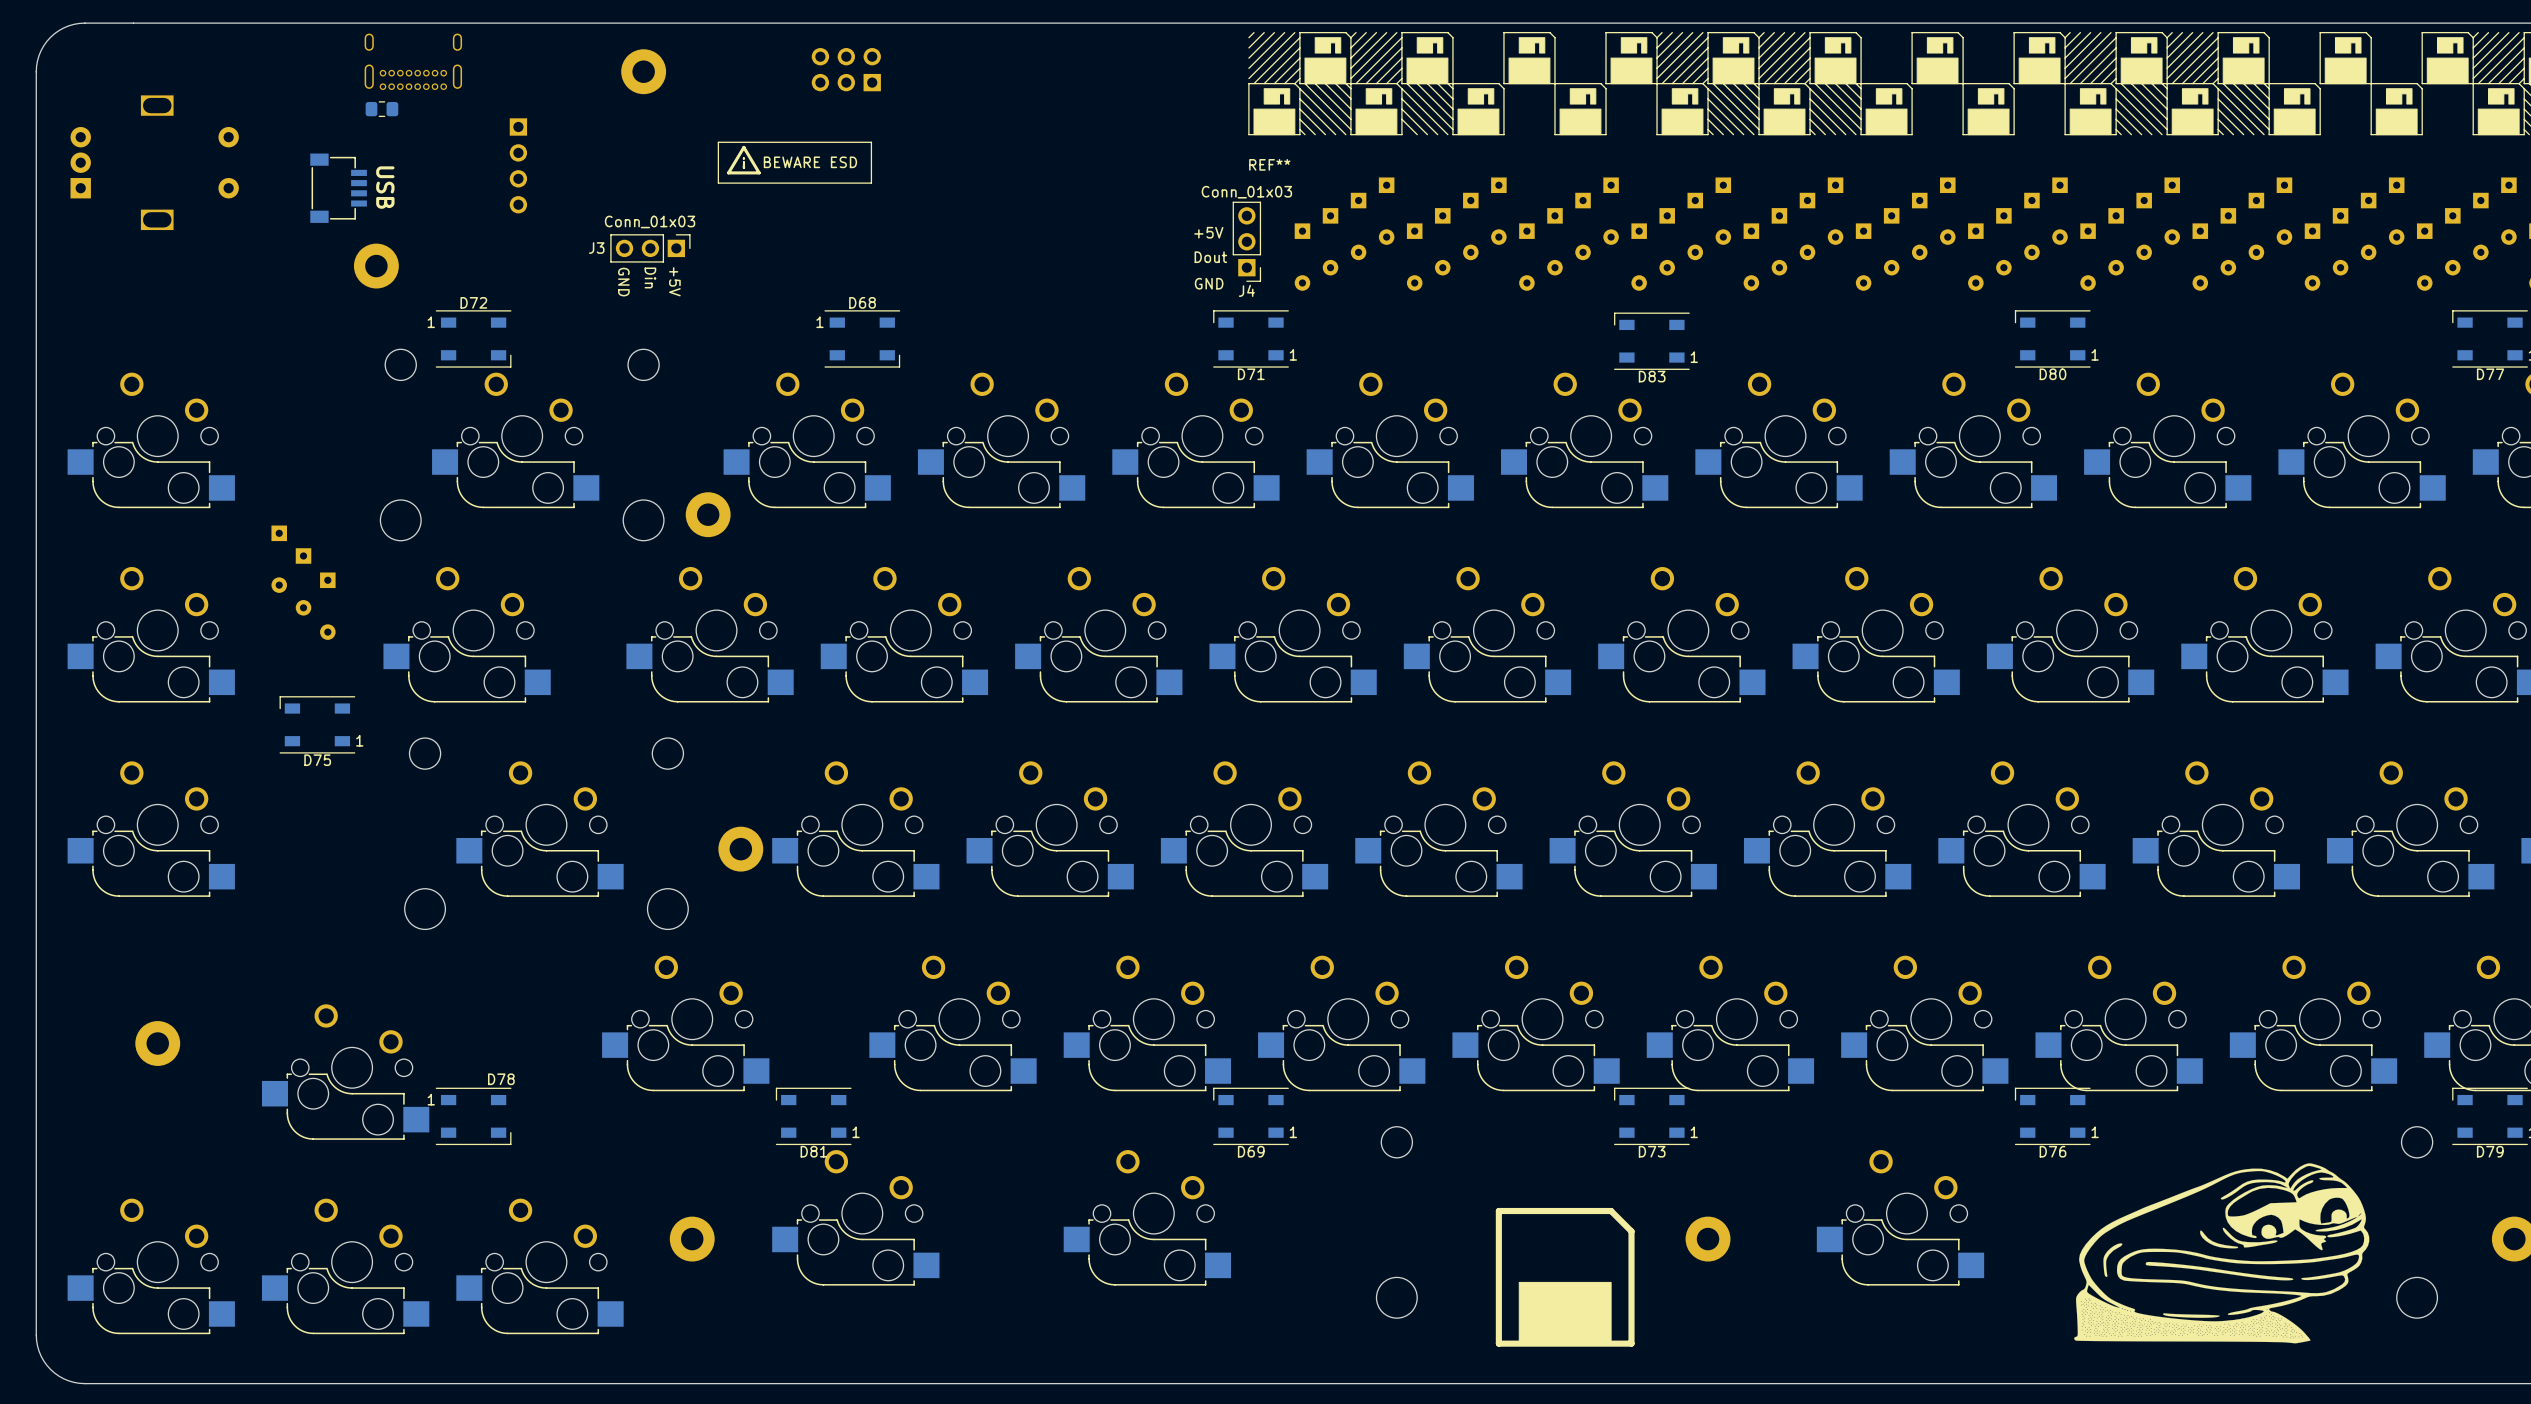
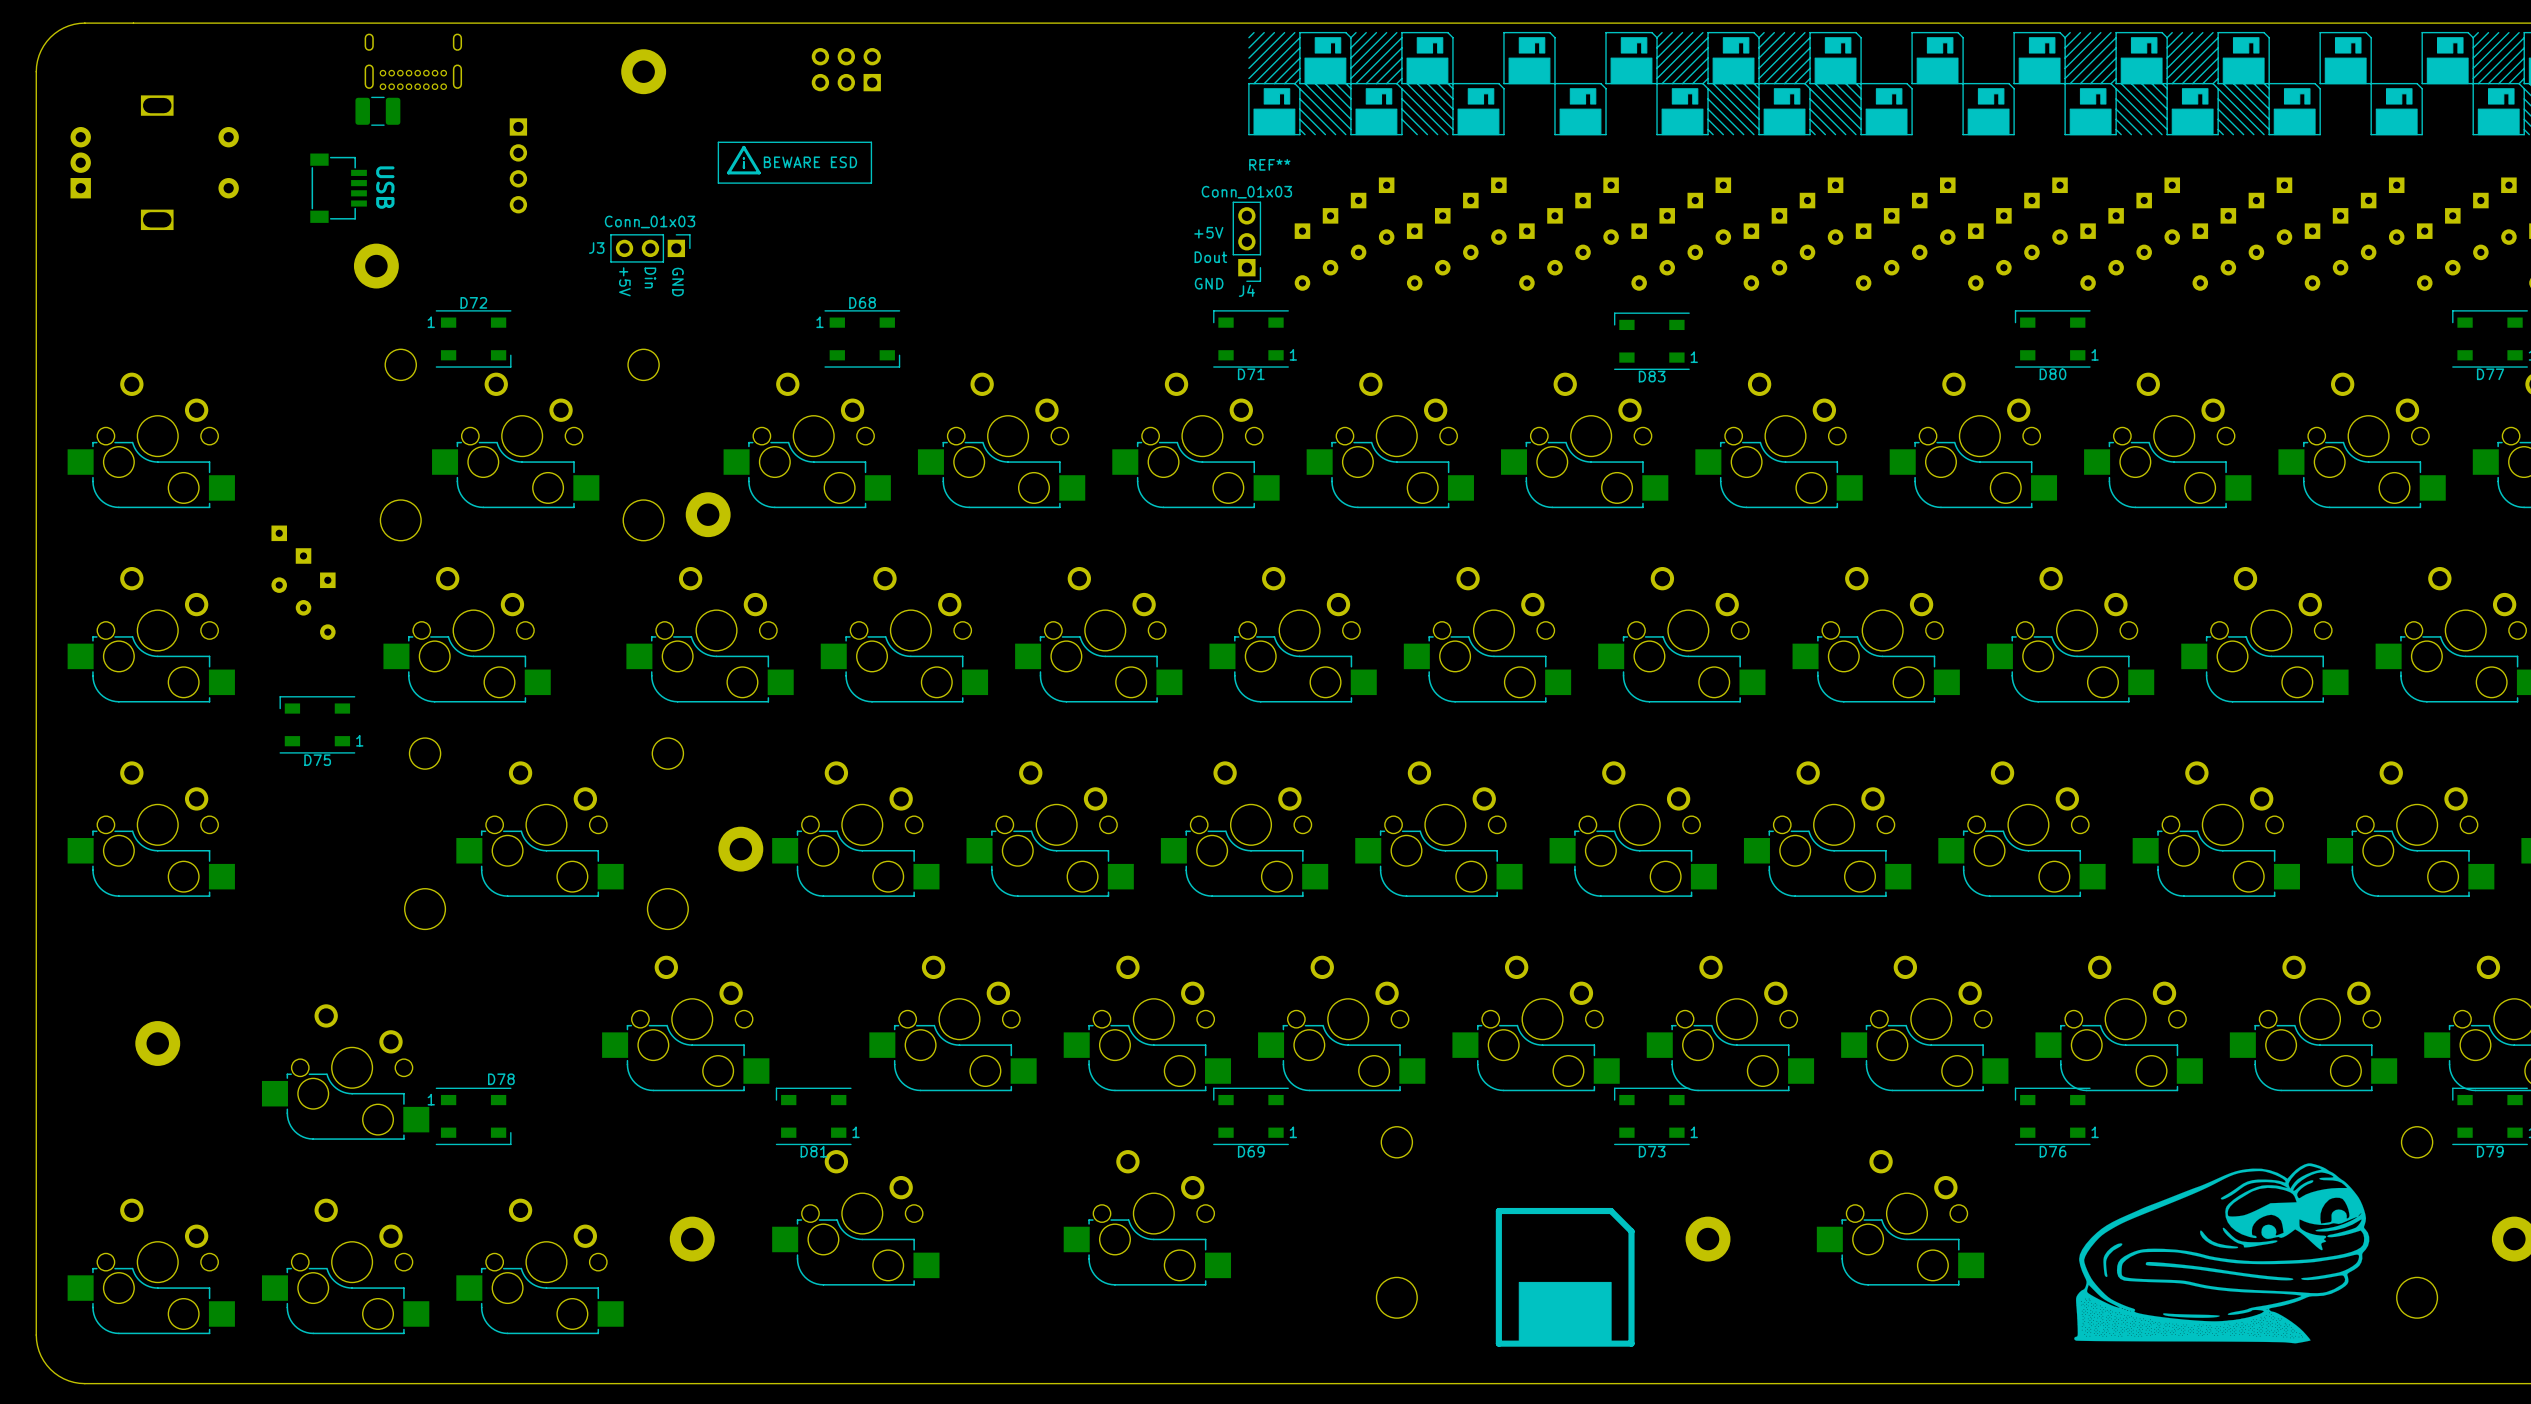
part footprint: [365, 101, 399, 117] -> [355, 96, 401, 126]
text: +5V (674, 281) -> GND (677, 282)
text: GND (623, 282) -> +5V (624, 281)

